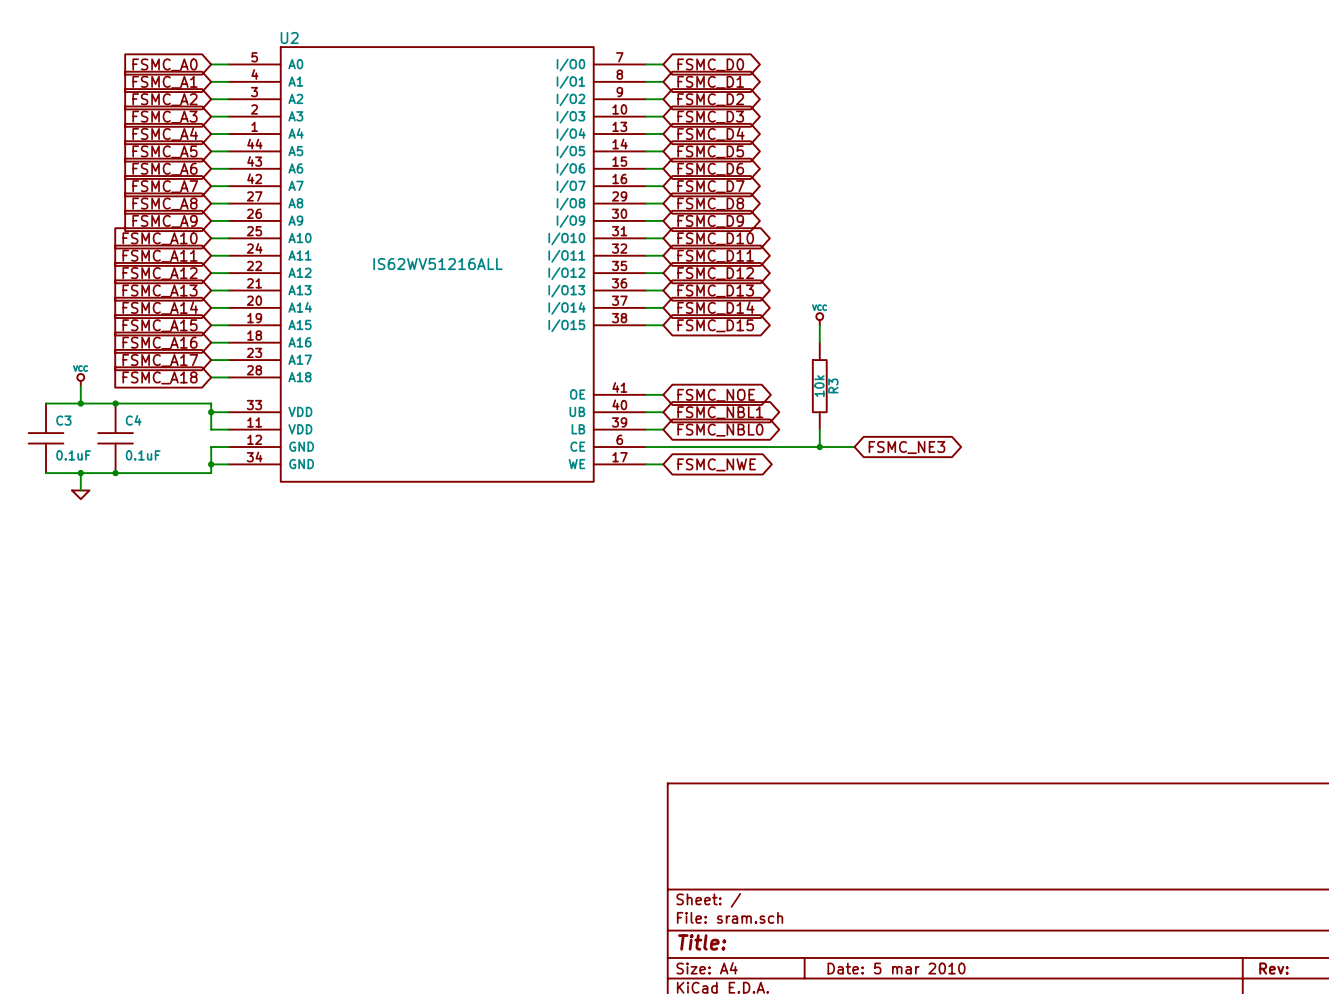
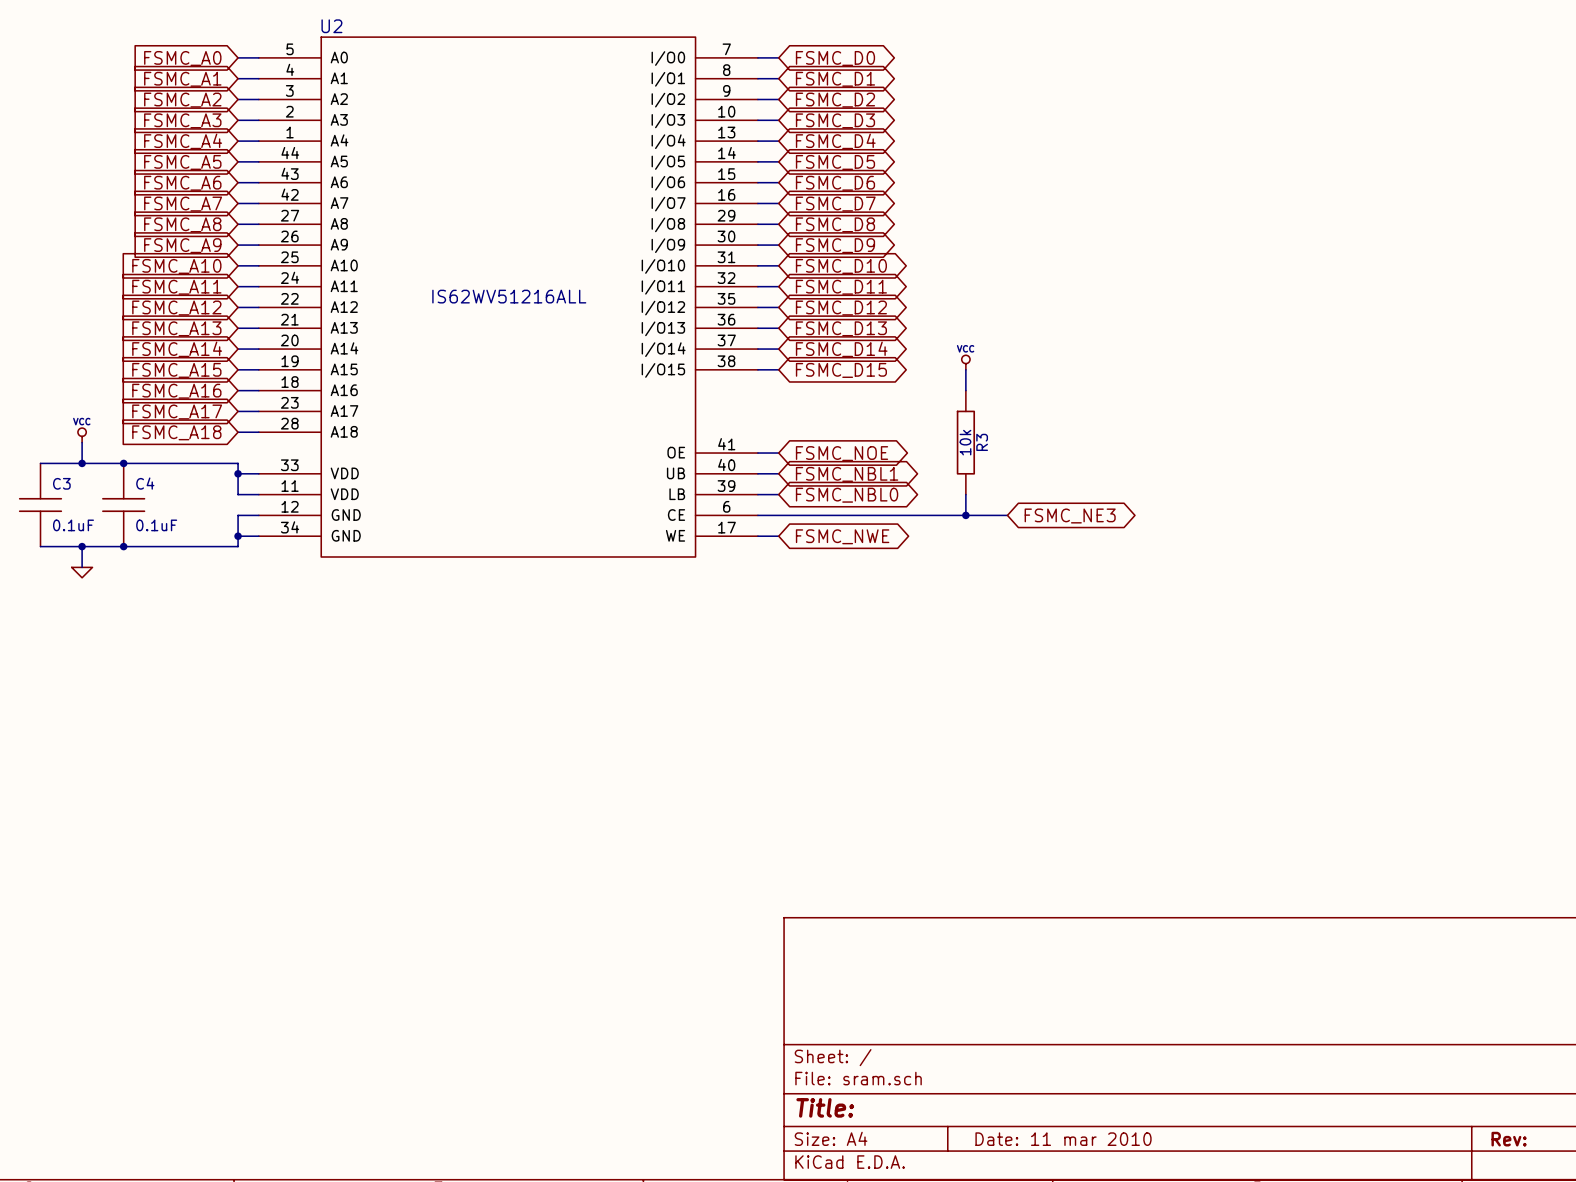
title block: Date: 5 mar 2010 (896, 968) -> Date: 11 mar 2010 (1063, 1139)

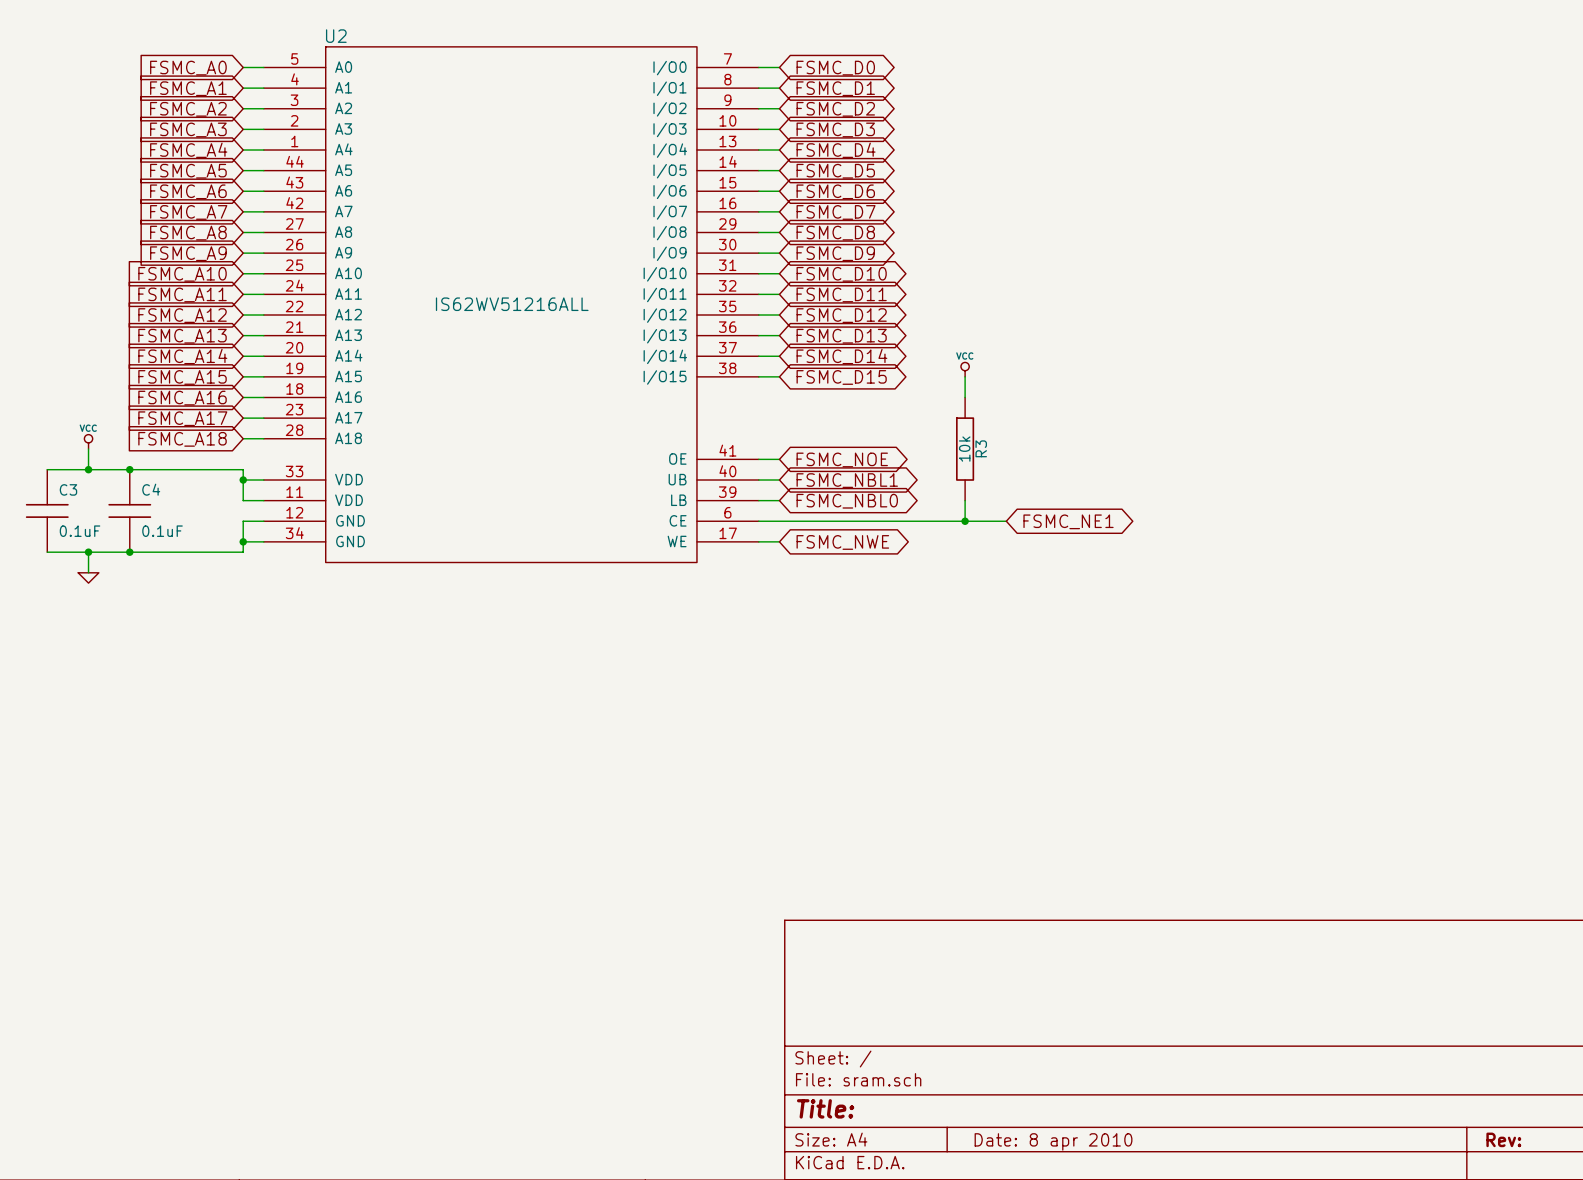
global label: FSMC_NE3 (1070, 516) -> FSMC_NE1 (1068, 521)
title block: Date: 11 mar 2010 (1063, 1139) -> Date: 8 apr 2010 (1053, 1141)

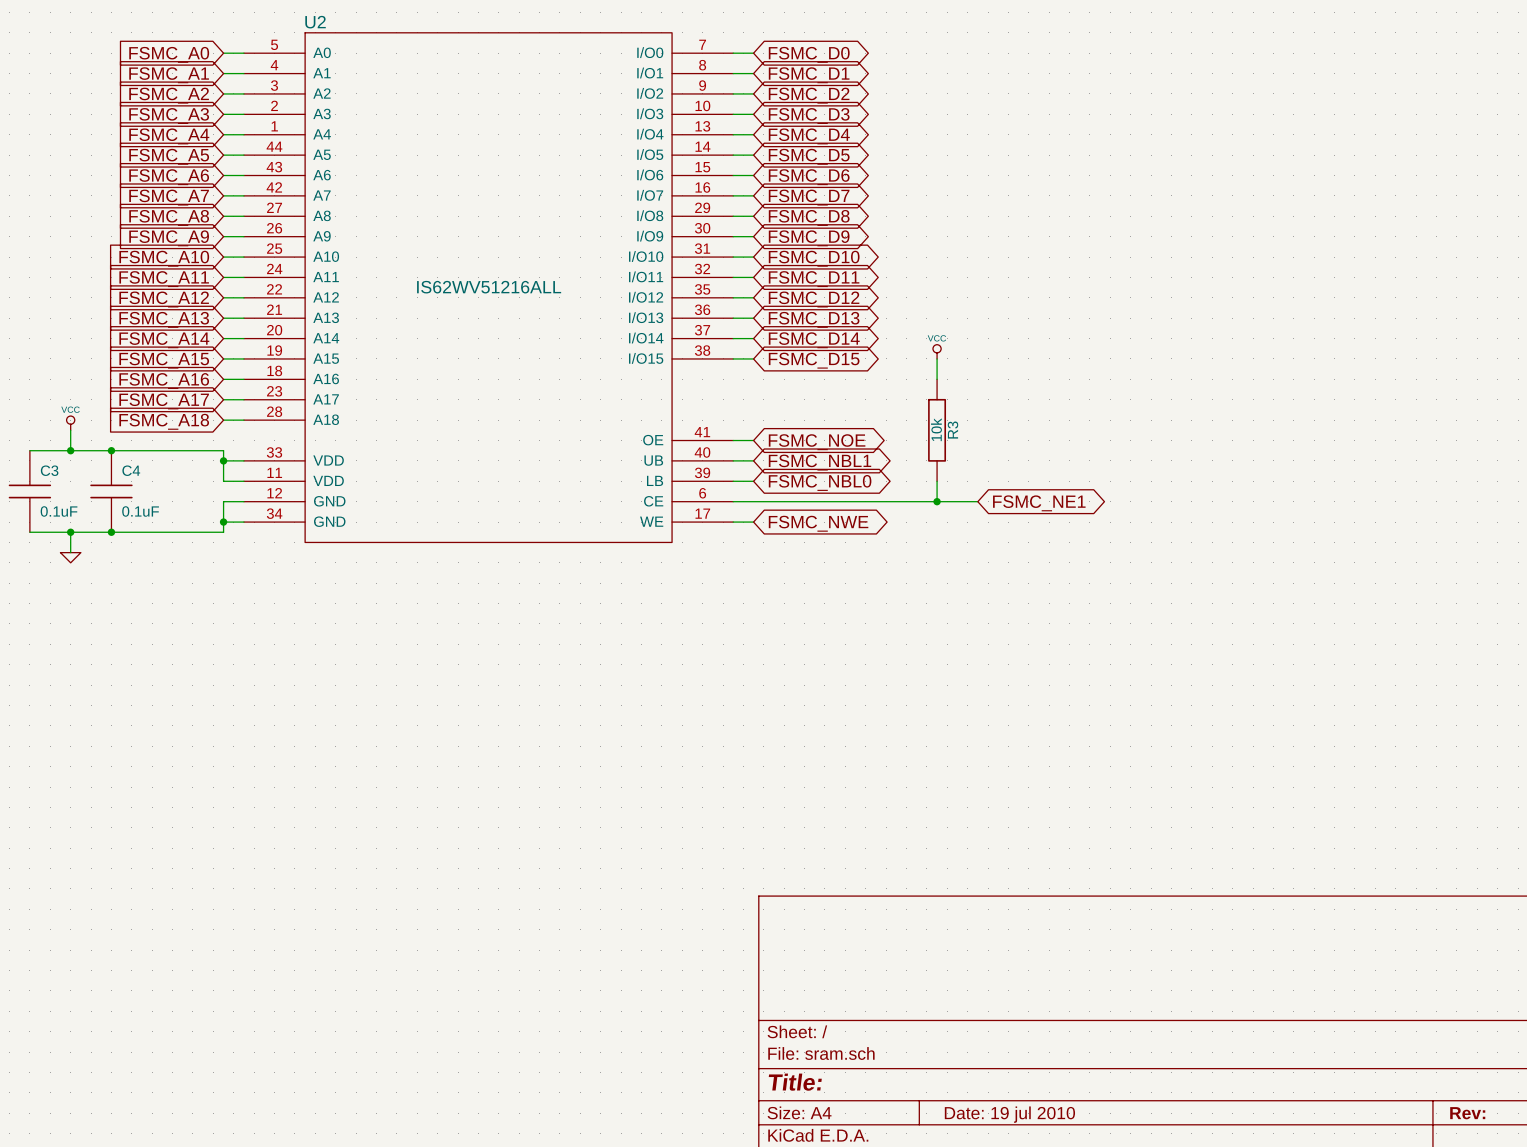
title block: Date: 8 apr 2010 (1053, 1141) -> Date: 19 jul 2010 (1009, 1114)

